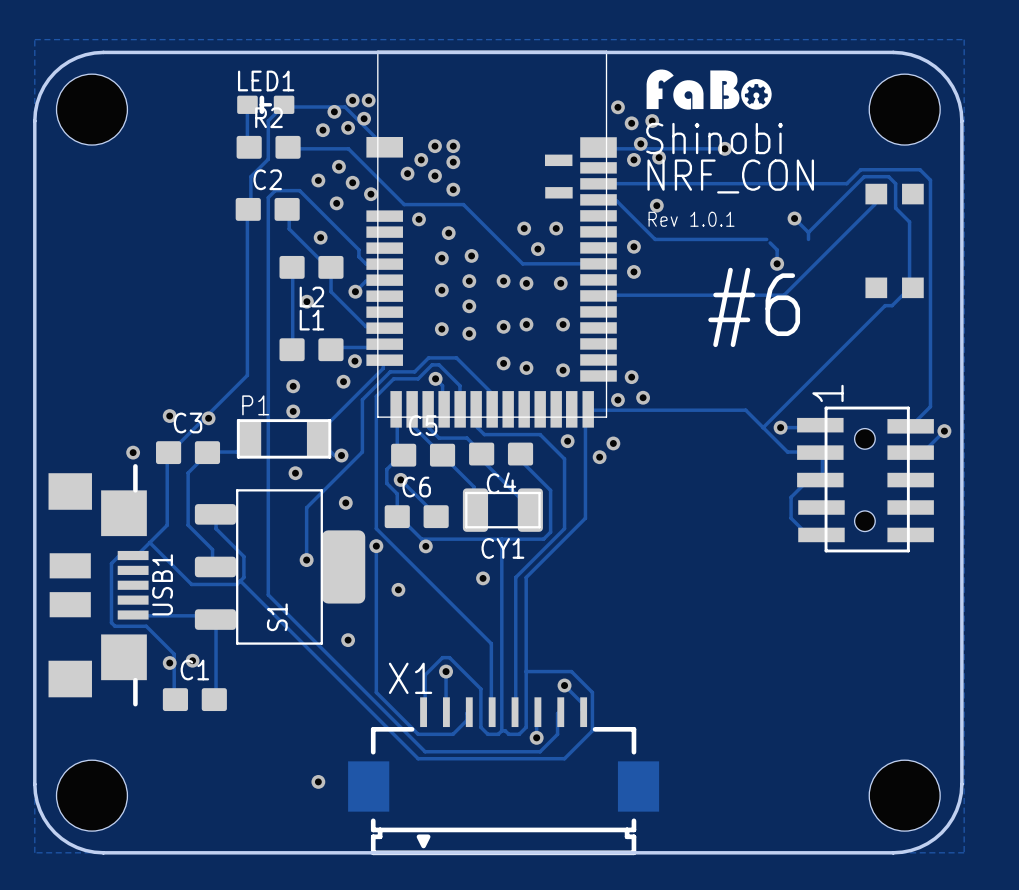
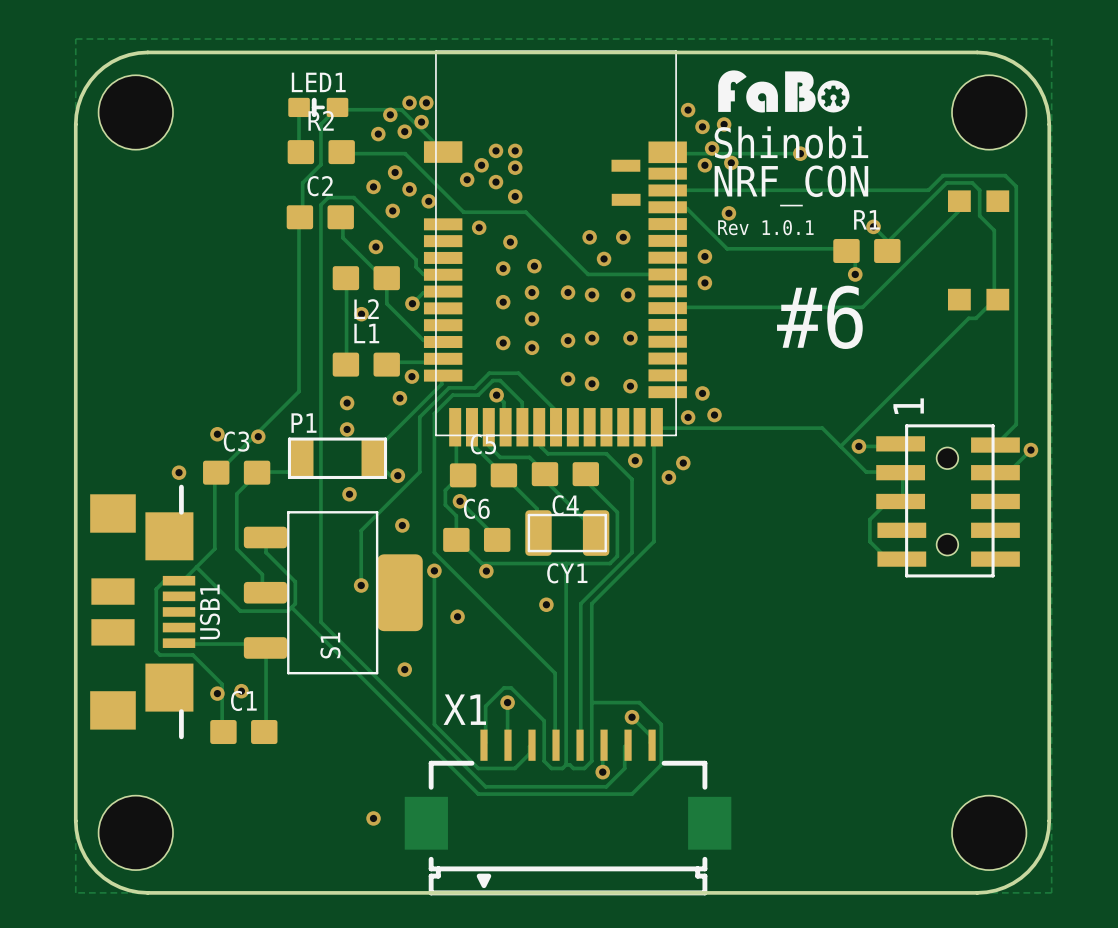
R1: none -> (866, 250)

